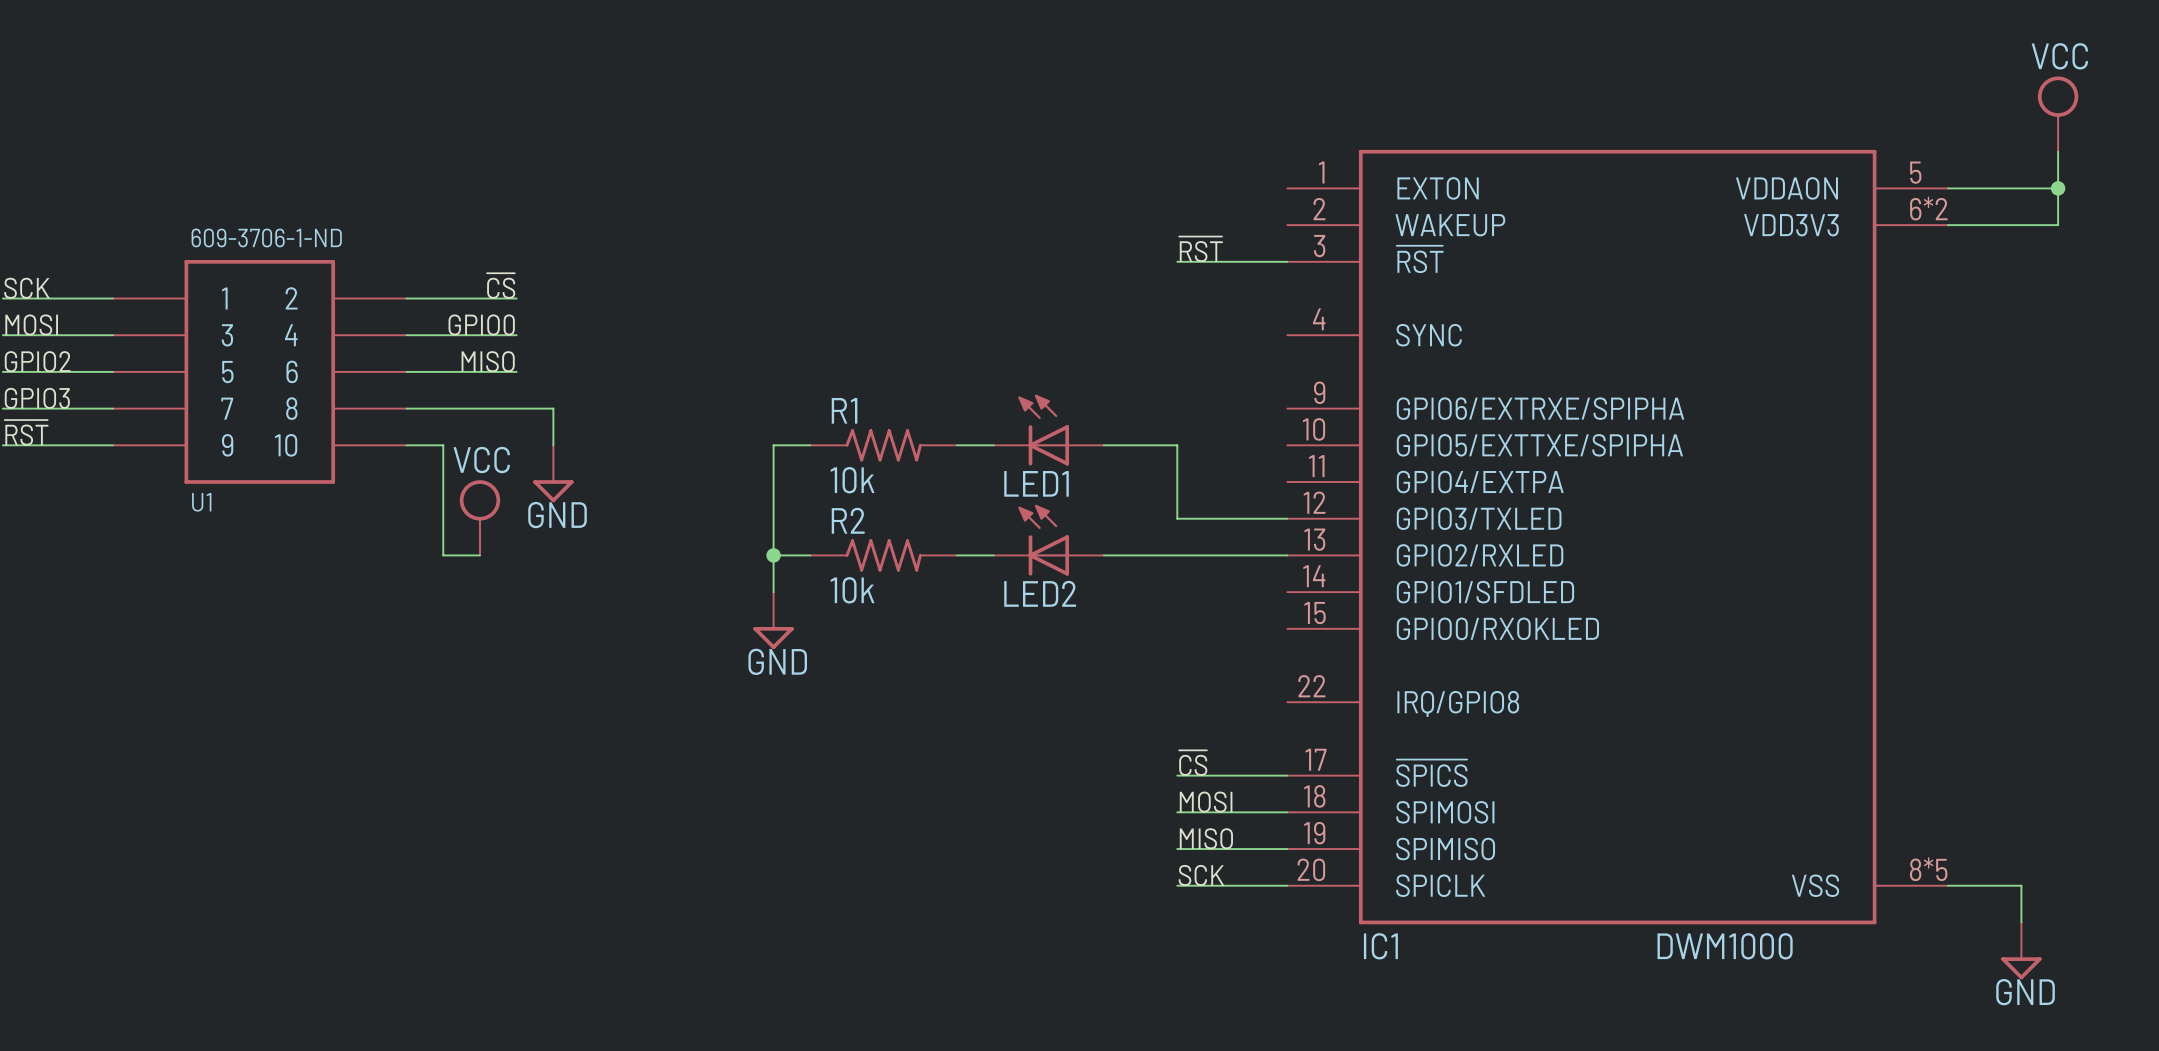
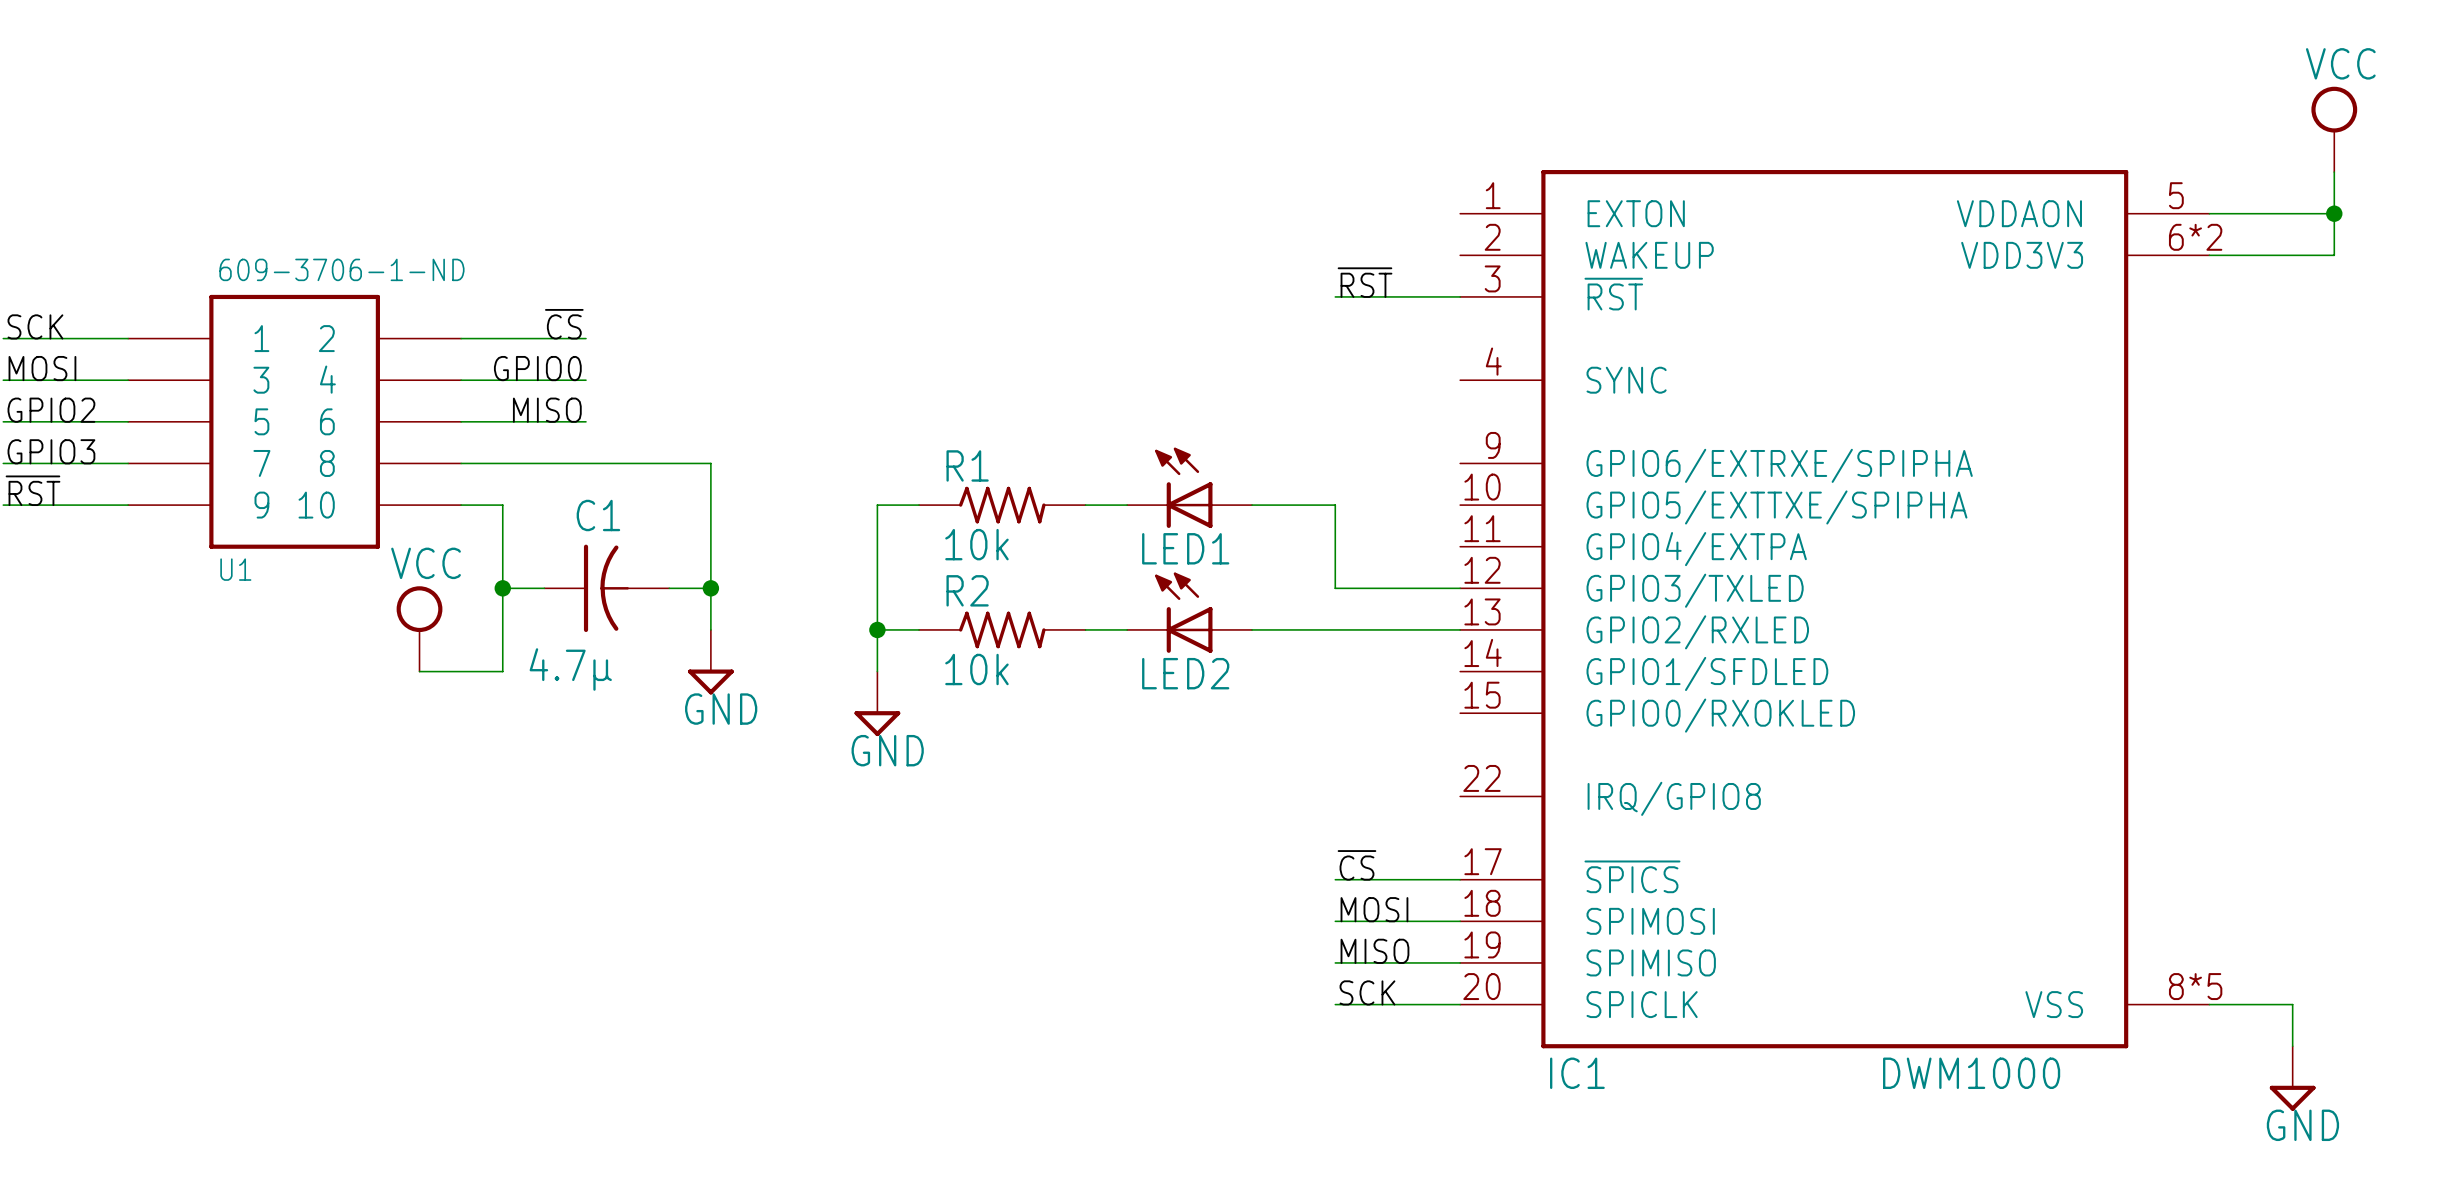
wire: (553, 408) (553, 445) -> (627, 463) (710, 463) (710, 629)
power symbol position: GND (553, 473) -> GND (710, 662)
power symbol position: VCC (479, 517) -> VCC (419, 628)
wire: none -> (502, 588) (544, 588)
junction: none -> (502, 588)
C1: none -> 4.7µ (606, 588)
wire: none -> (669, 588) (710, 588)
junction: none -> (710, 588)
wire: (443, 555) (479, 555) -> (502, 629) (502, 671) (419, 671)

